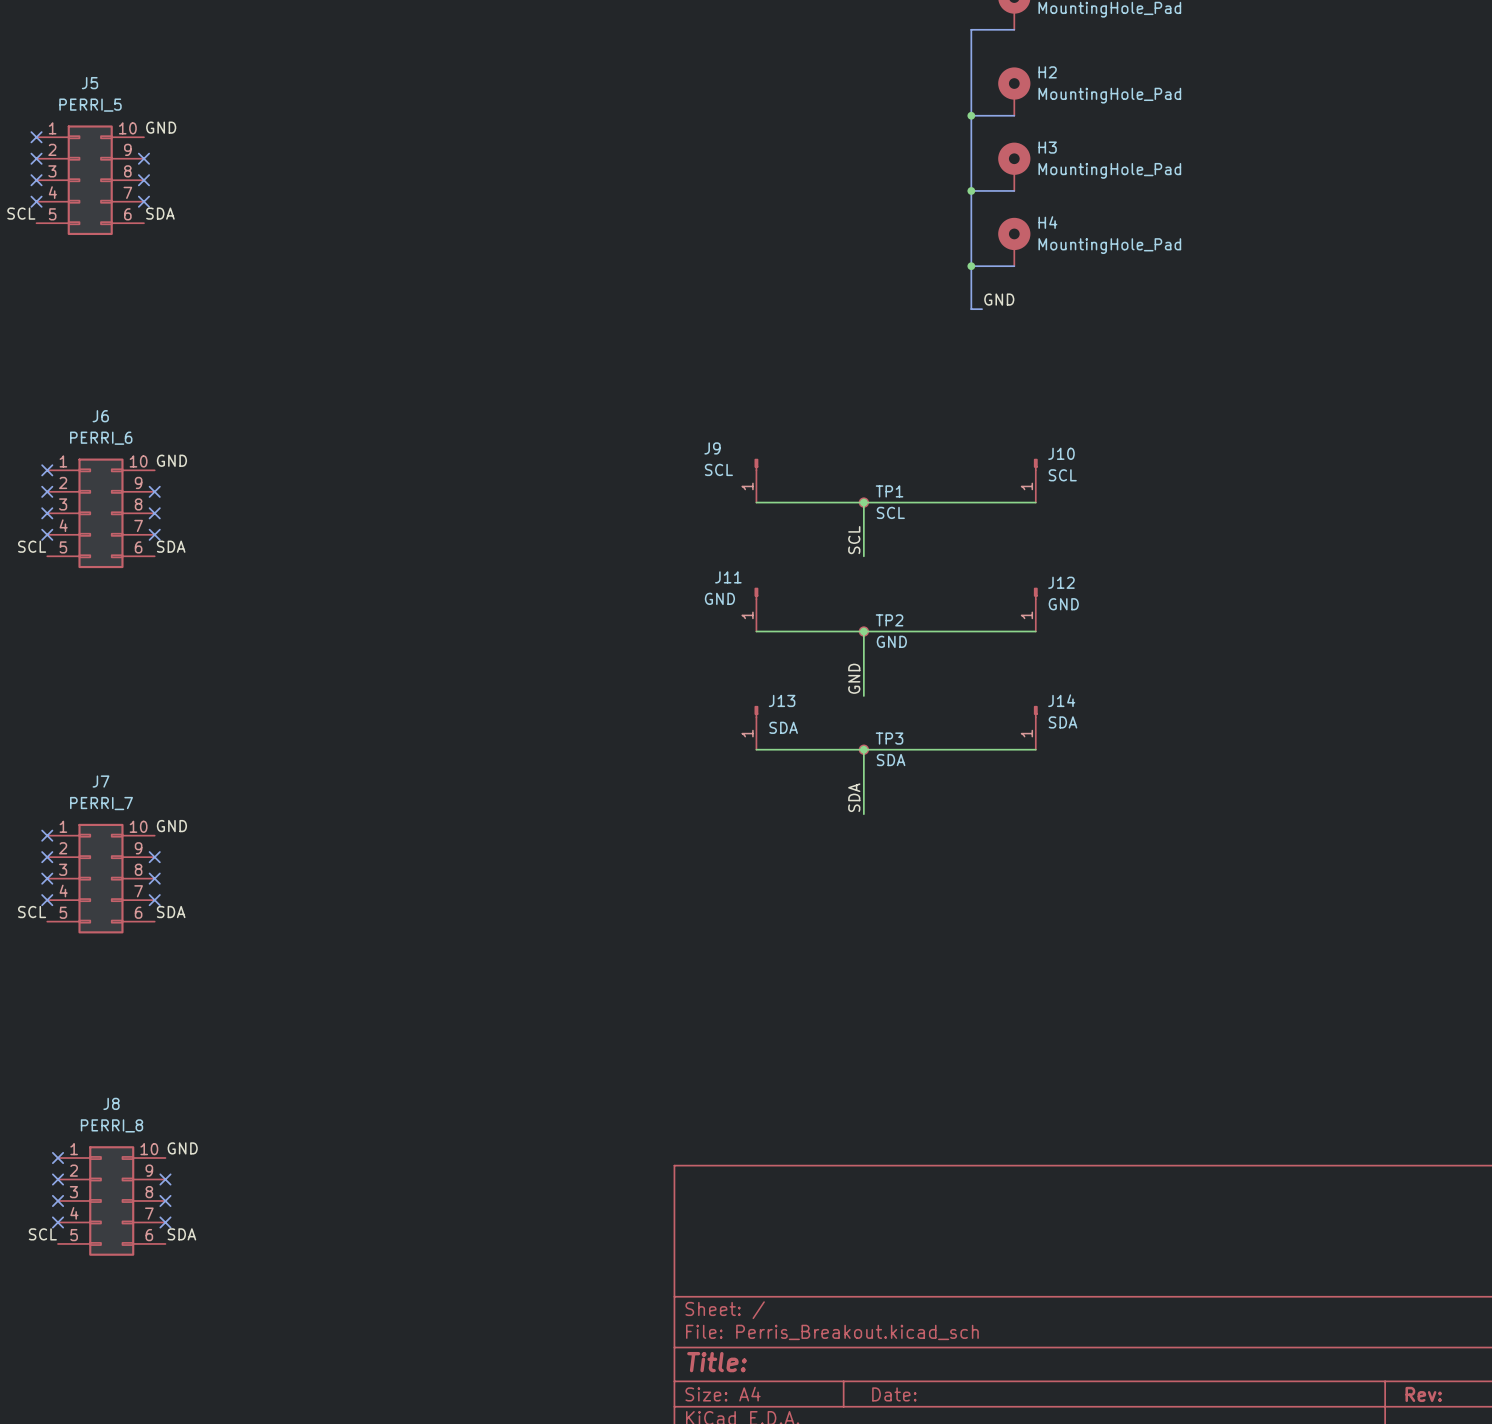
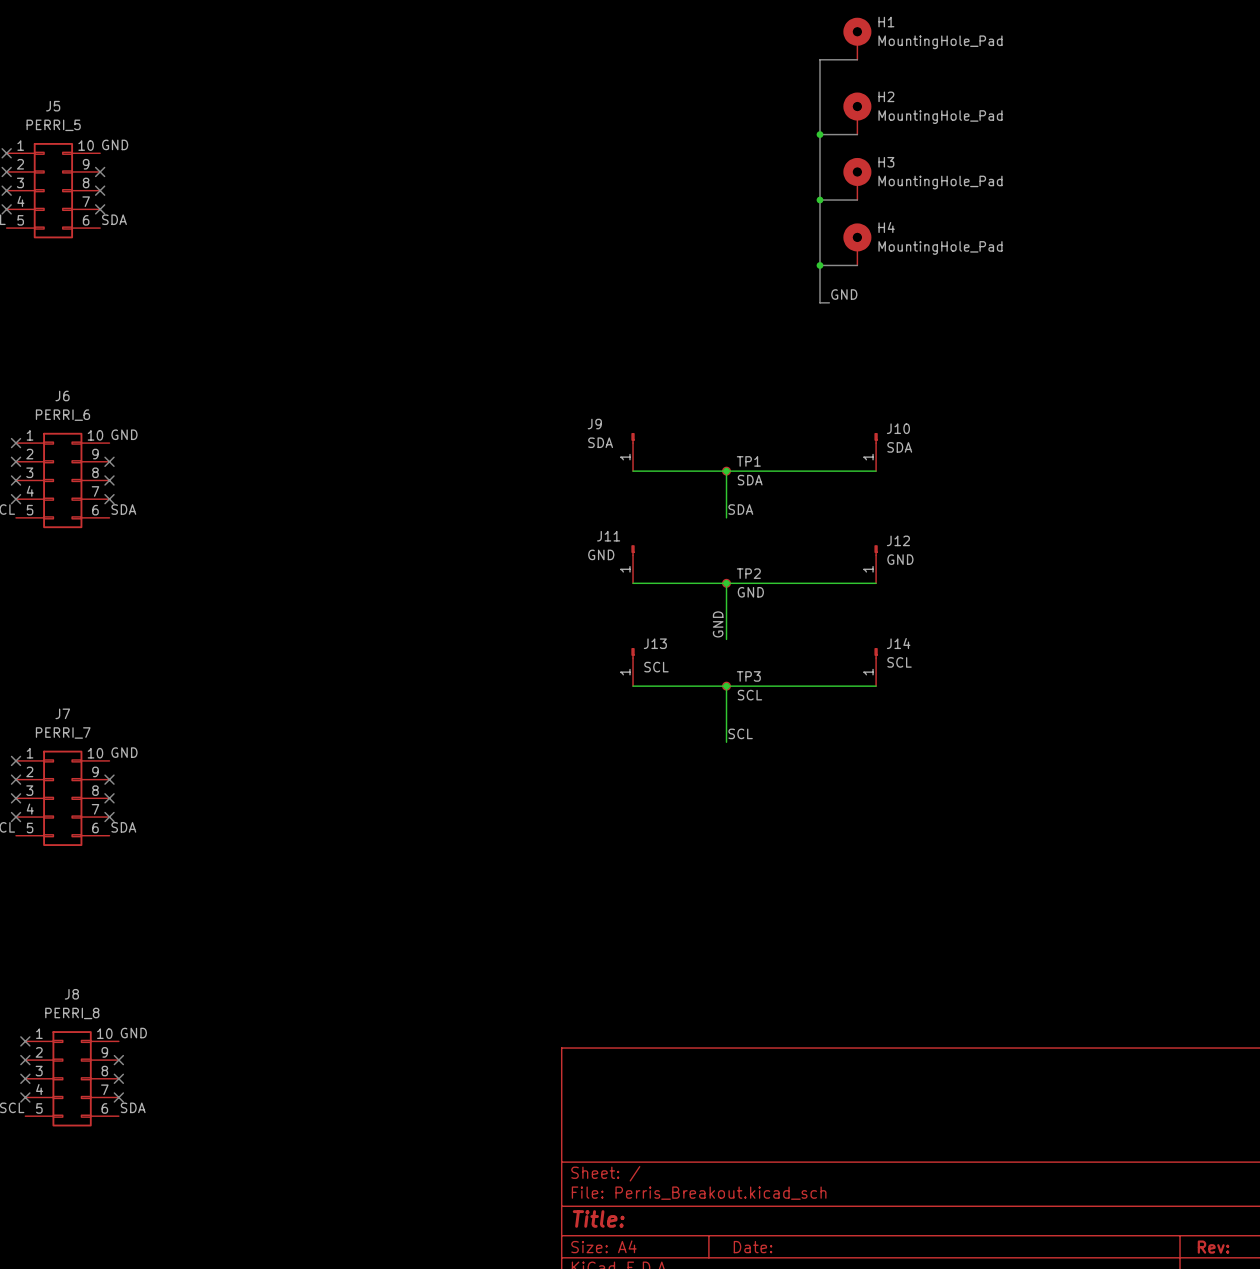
J9 value: SCL (718, 469) -> SDA (600, 442)
J10 value: SCL (1062, 475) -> SDA (899, 447)
TP1 value: SCL (890, 512) -> SDA (750, 480)
label: SCL (854, 540) -> SDA (740, 509)
J14 value: SDA (1062, 722) -> SCL (899, 662)
J13 value: SDA (783, 727) -> SCL (656, 667)
TP3 value: SDA (891, 760) -> SCL (749, 695)
label: SDA (854, 797) -> SCL (740, 733)

